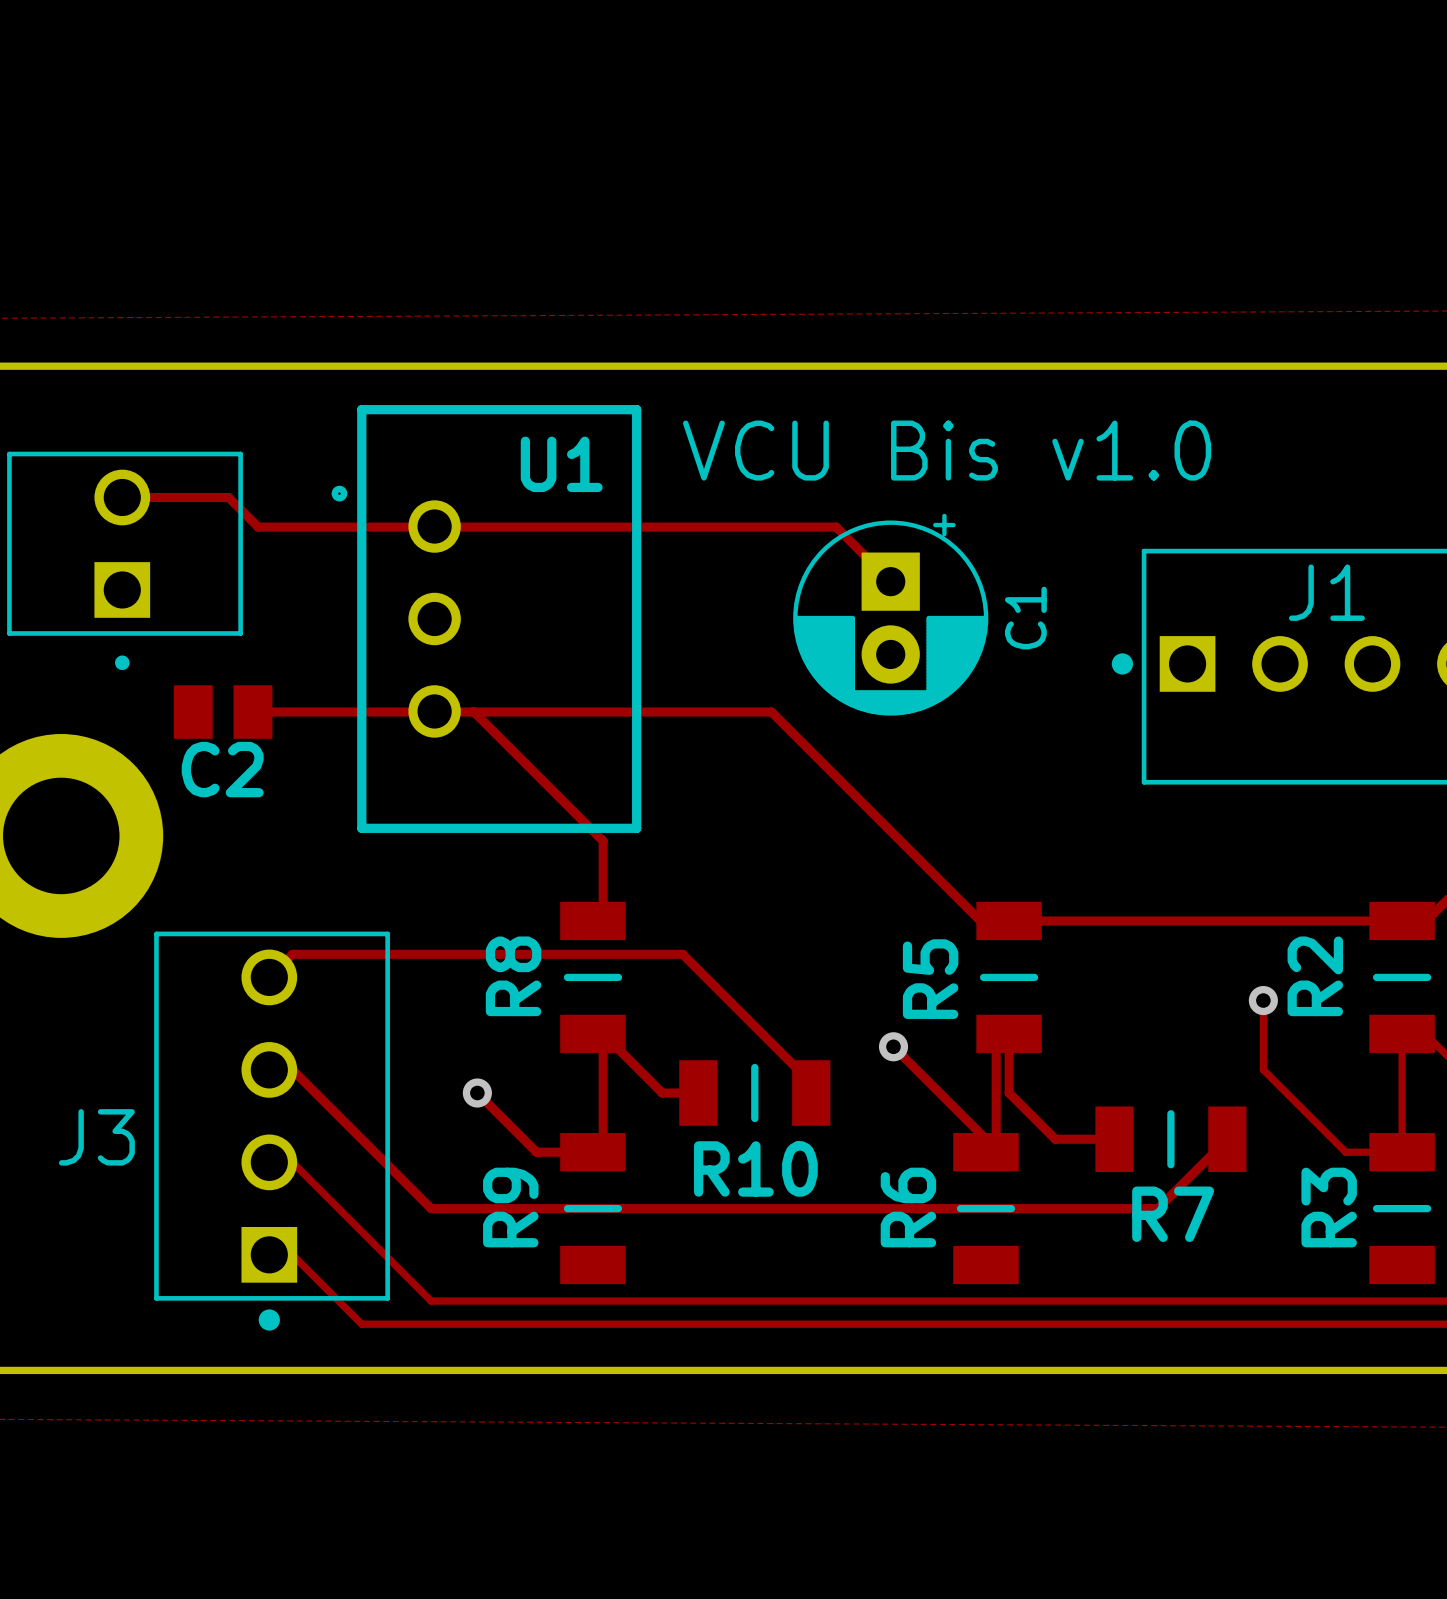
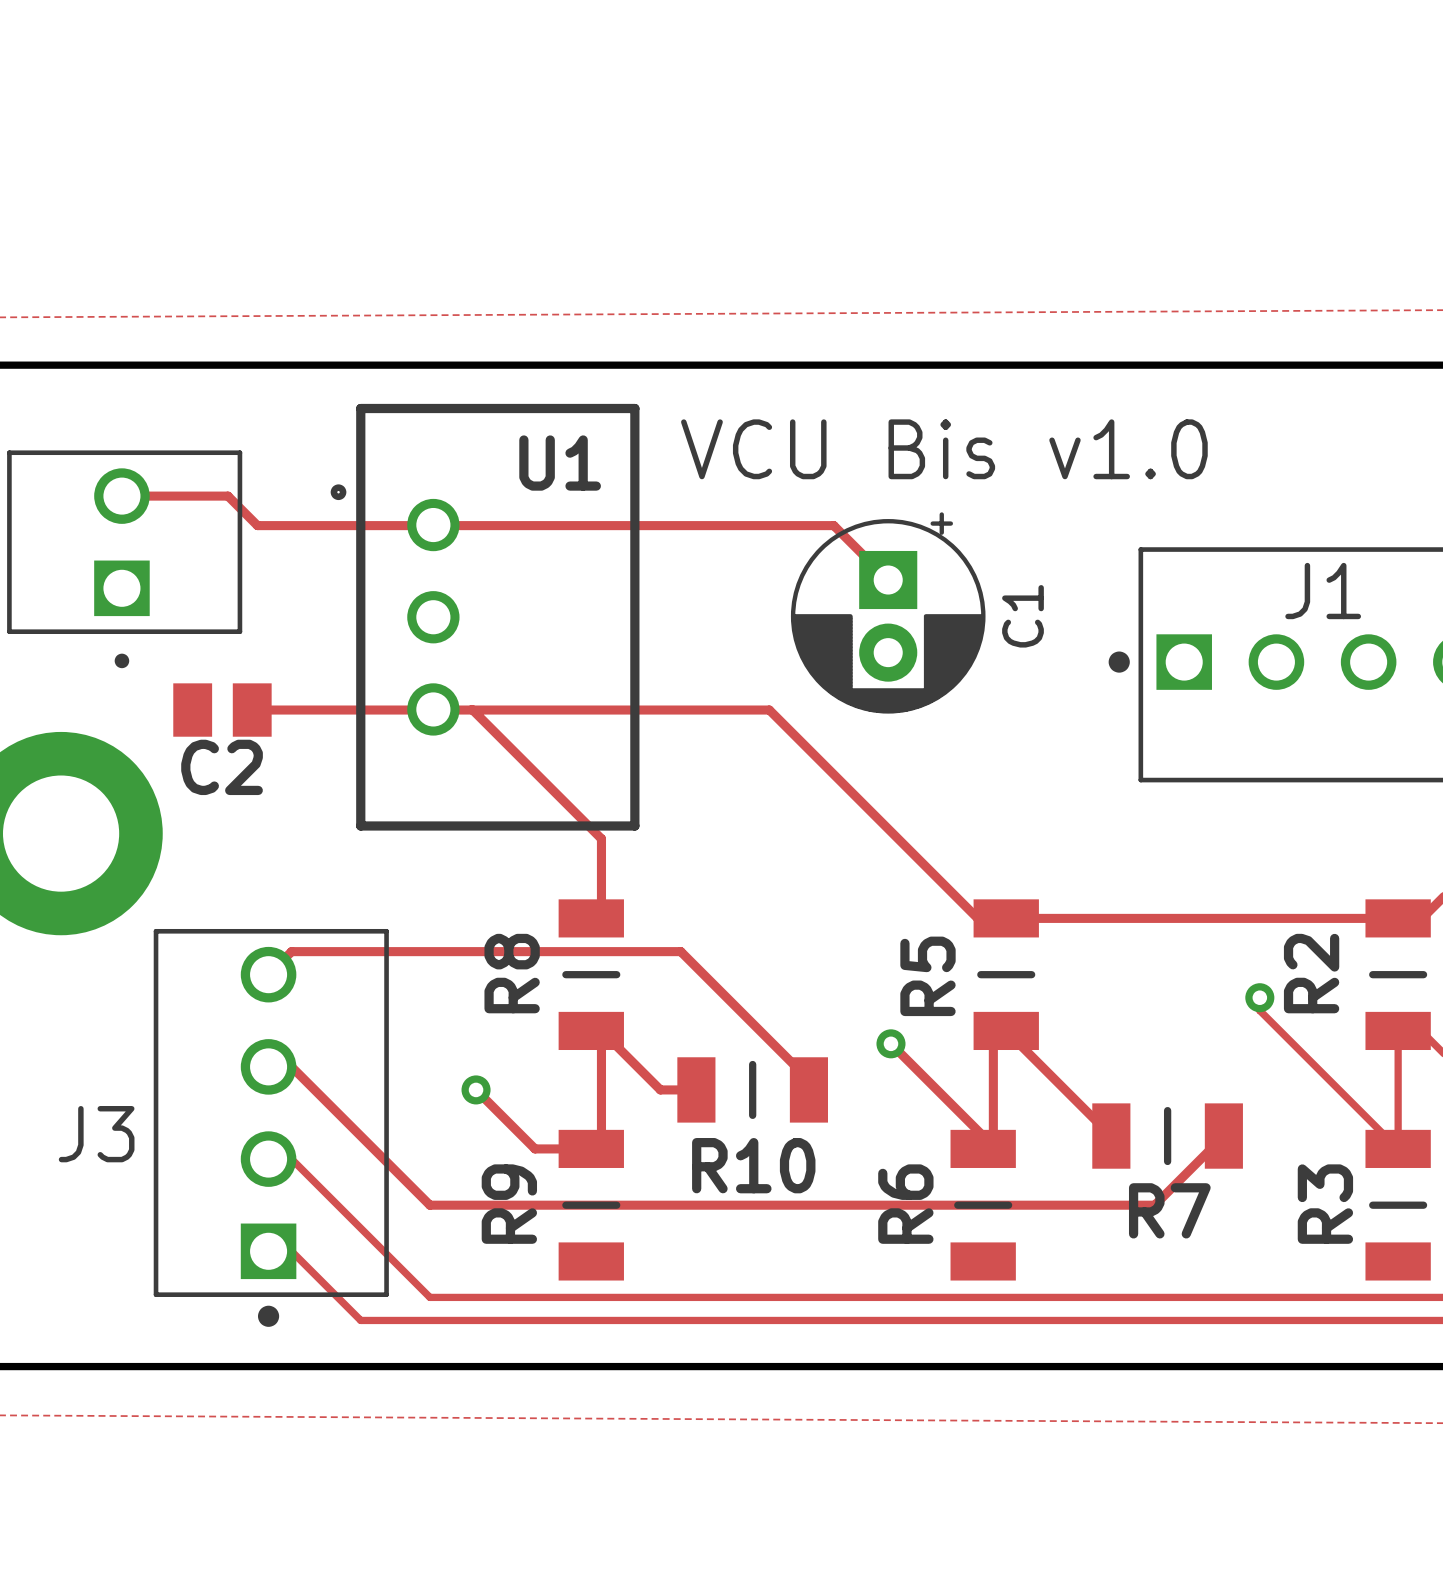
track: (1263, 1013) (1263, 1069) (1345, 1152) (1402, 1152) -> (1259, 1010) (1398, 1148)
track: (1009, 1033) (1009, 1093) (1055, 1139) (1114, 1139) -> (1006, 1030) (1111, 1136)

